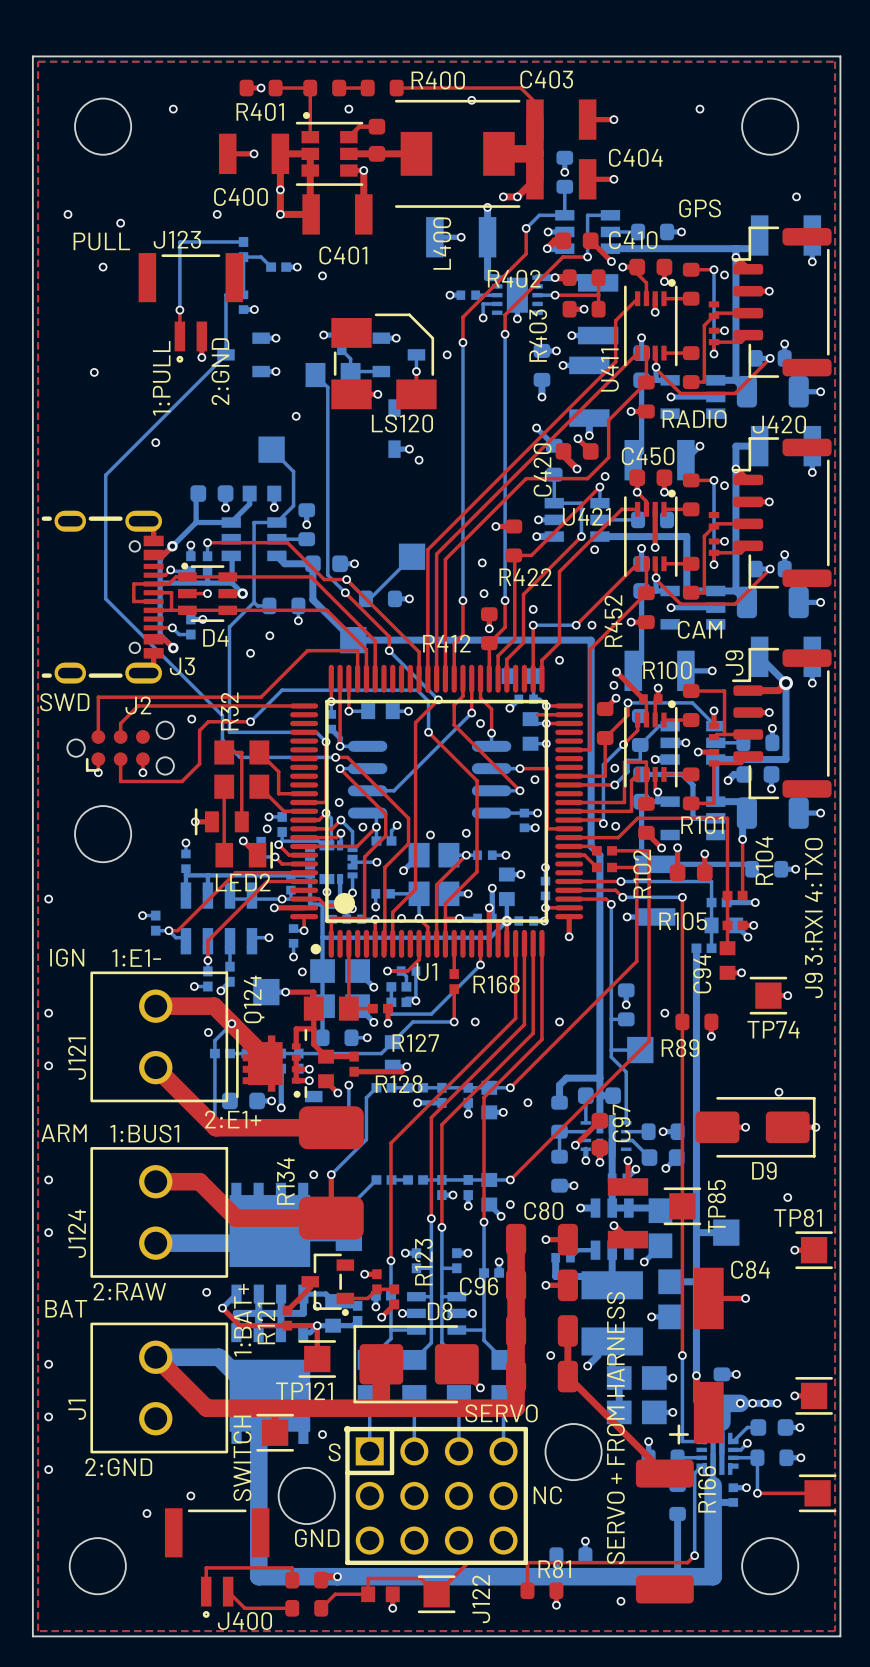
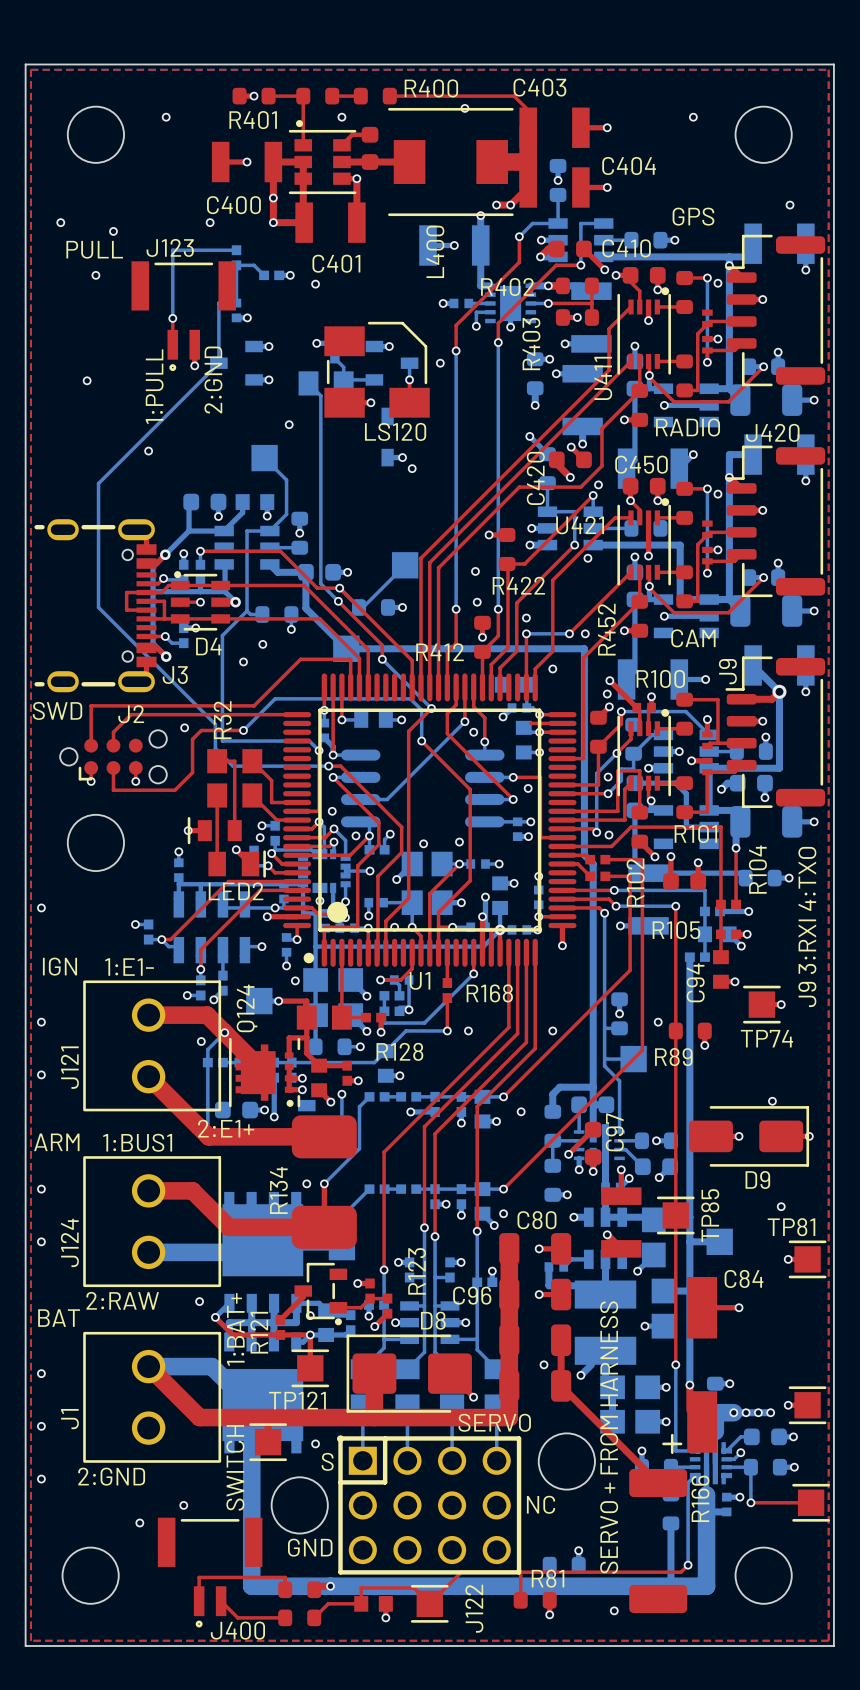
R127 name: R127 (415, 1042) -> none
top track: (406, 1066) (401, 1071) (365, 1071) -> none
via: none -> (358, 1080)
R128 name position: R128 (399, 1084) -> R128 (399, 1051)

